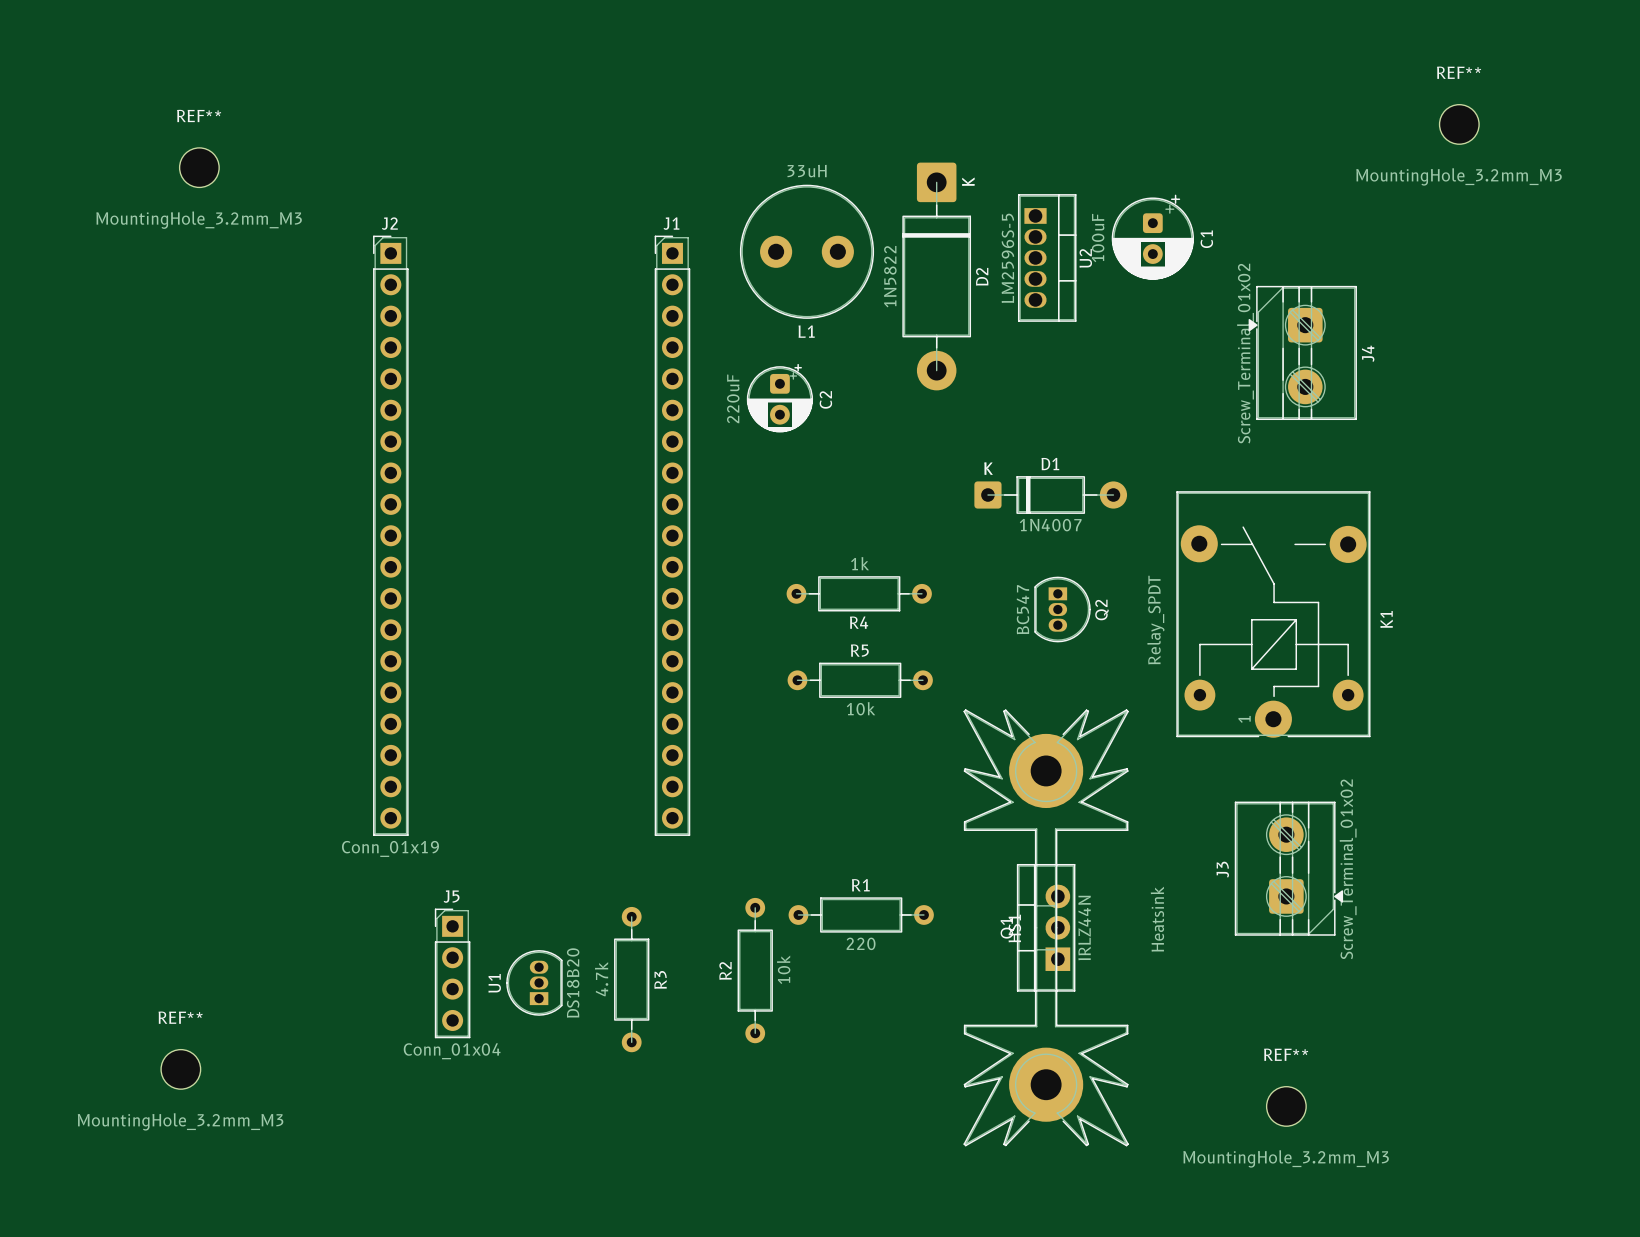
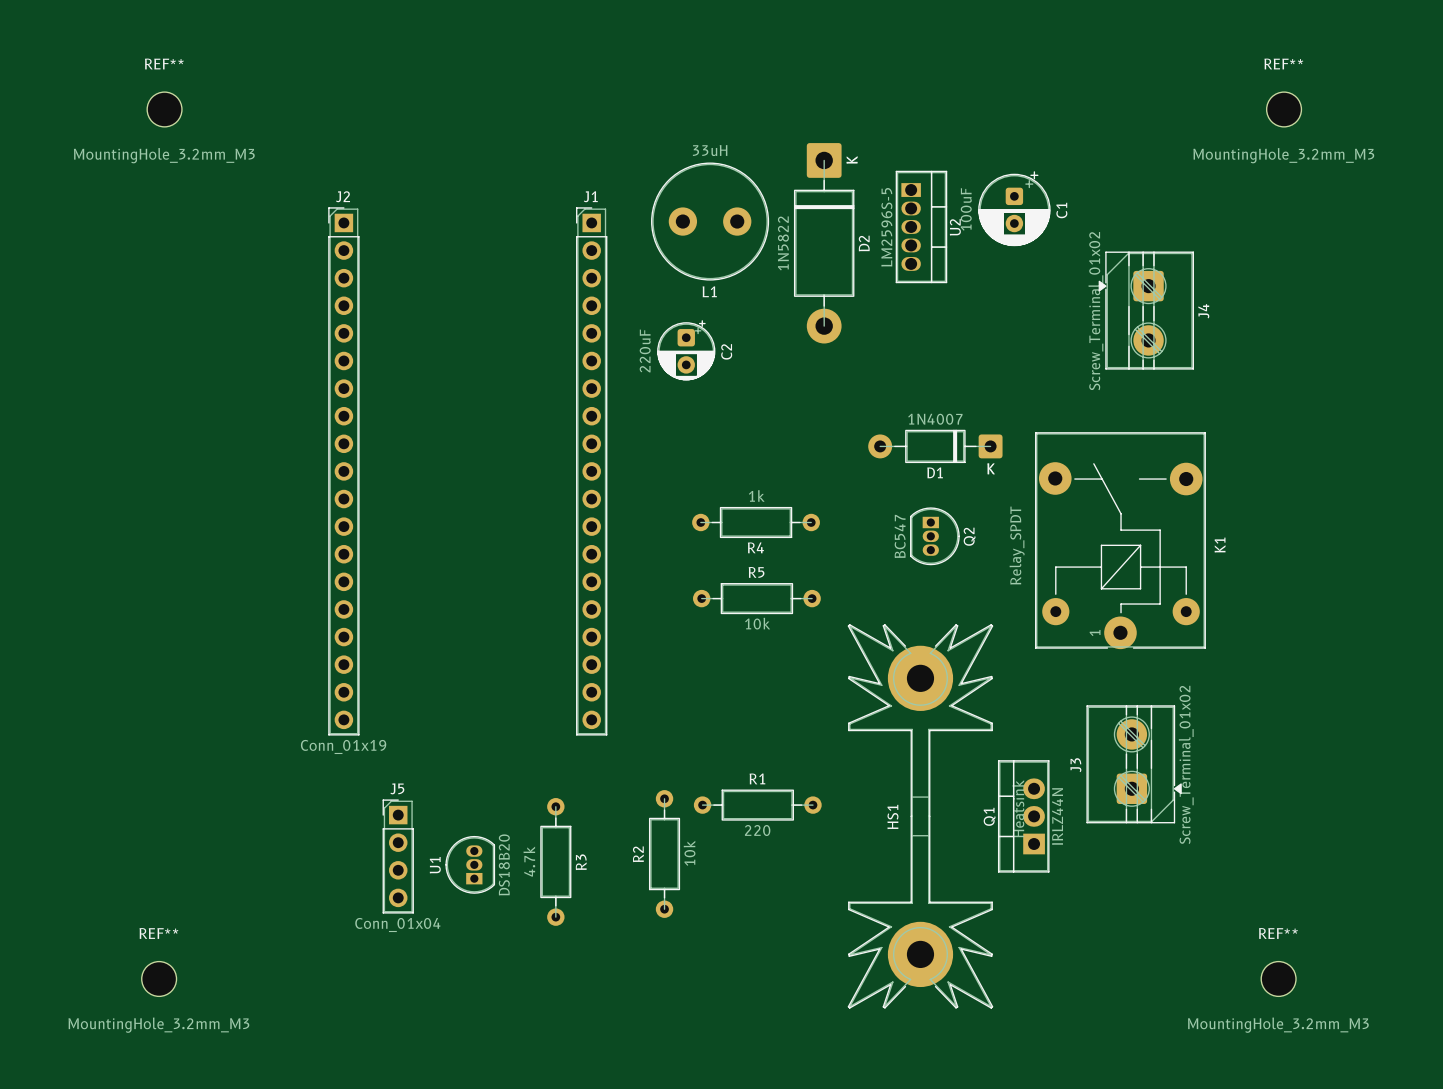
REF** position: (199, 167) -> (164, 109)
D1 rotation: 0° (1050, 495) -> 180° (935, 446)
Q1 position: (1046, 927) -> (1023, 816)
REF** position: (180, 1069) -> (159, 978)
REF** position: (1286, 1106) -> (1278, 978)

